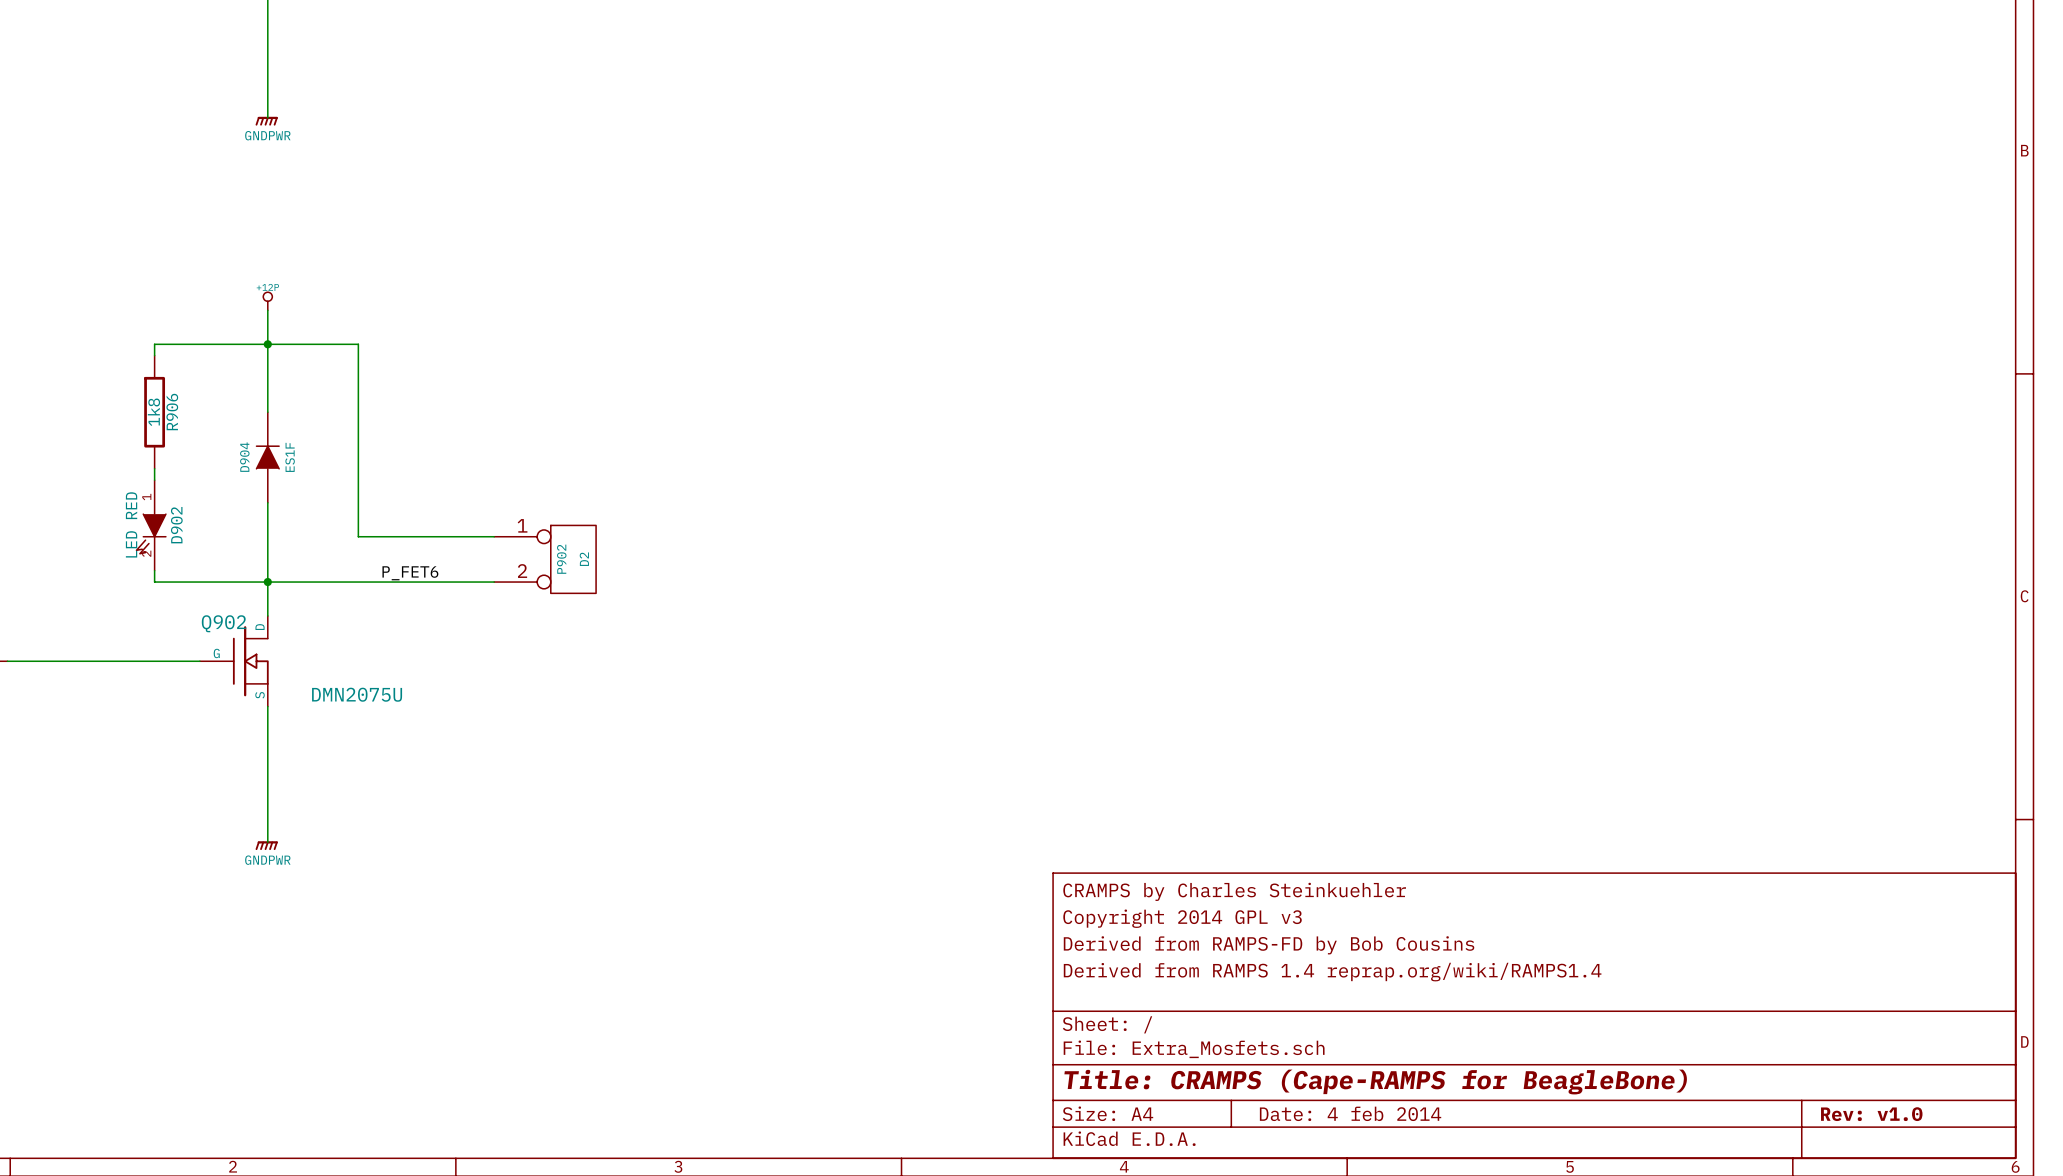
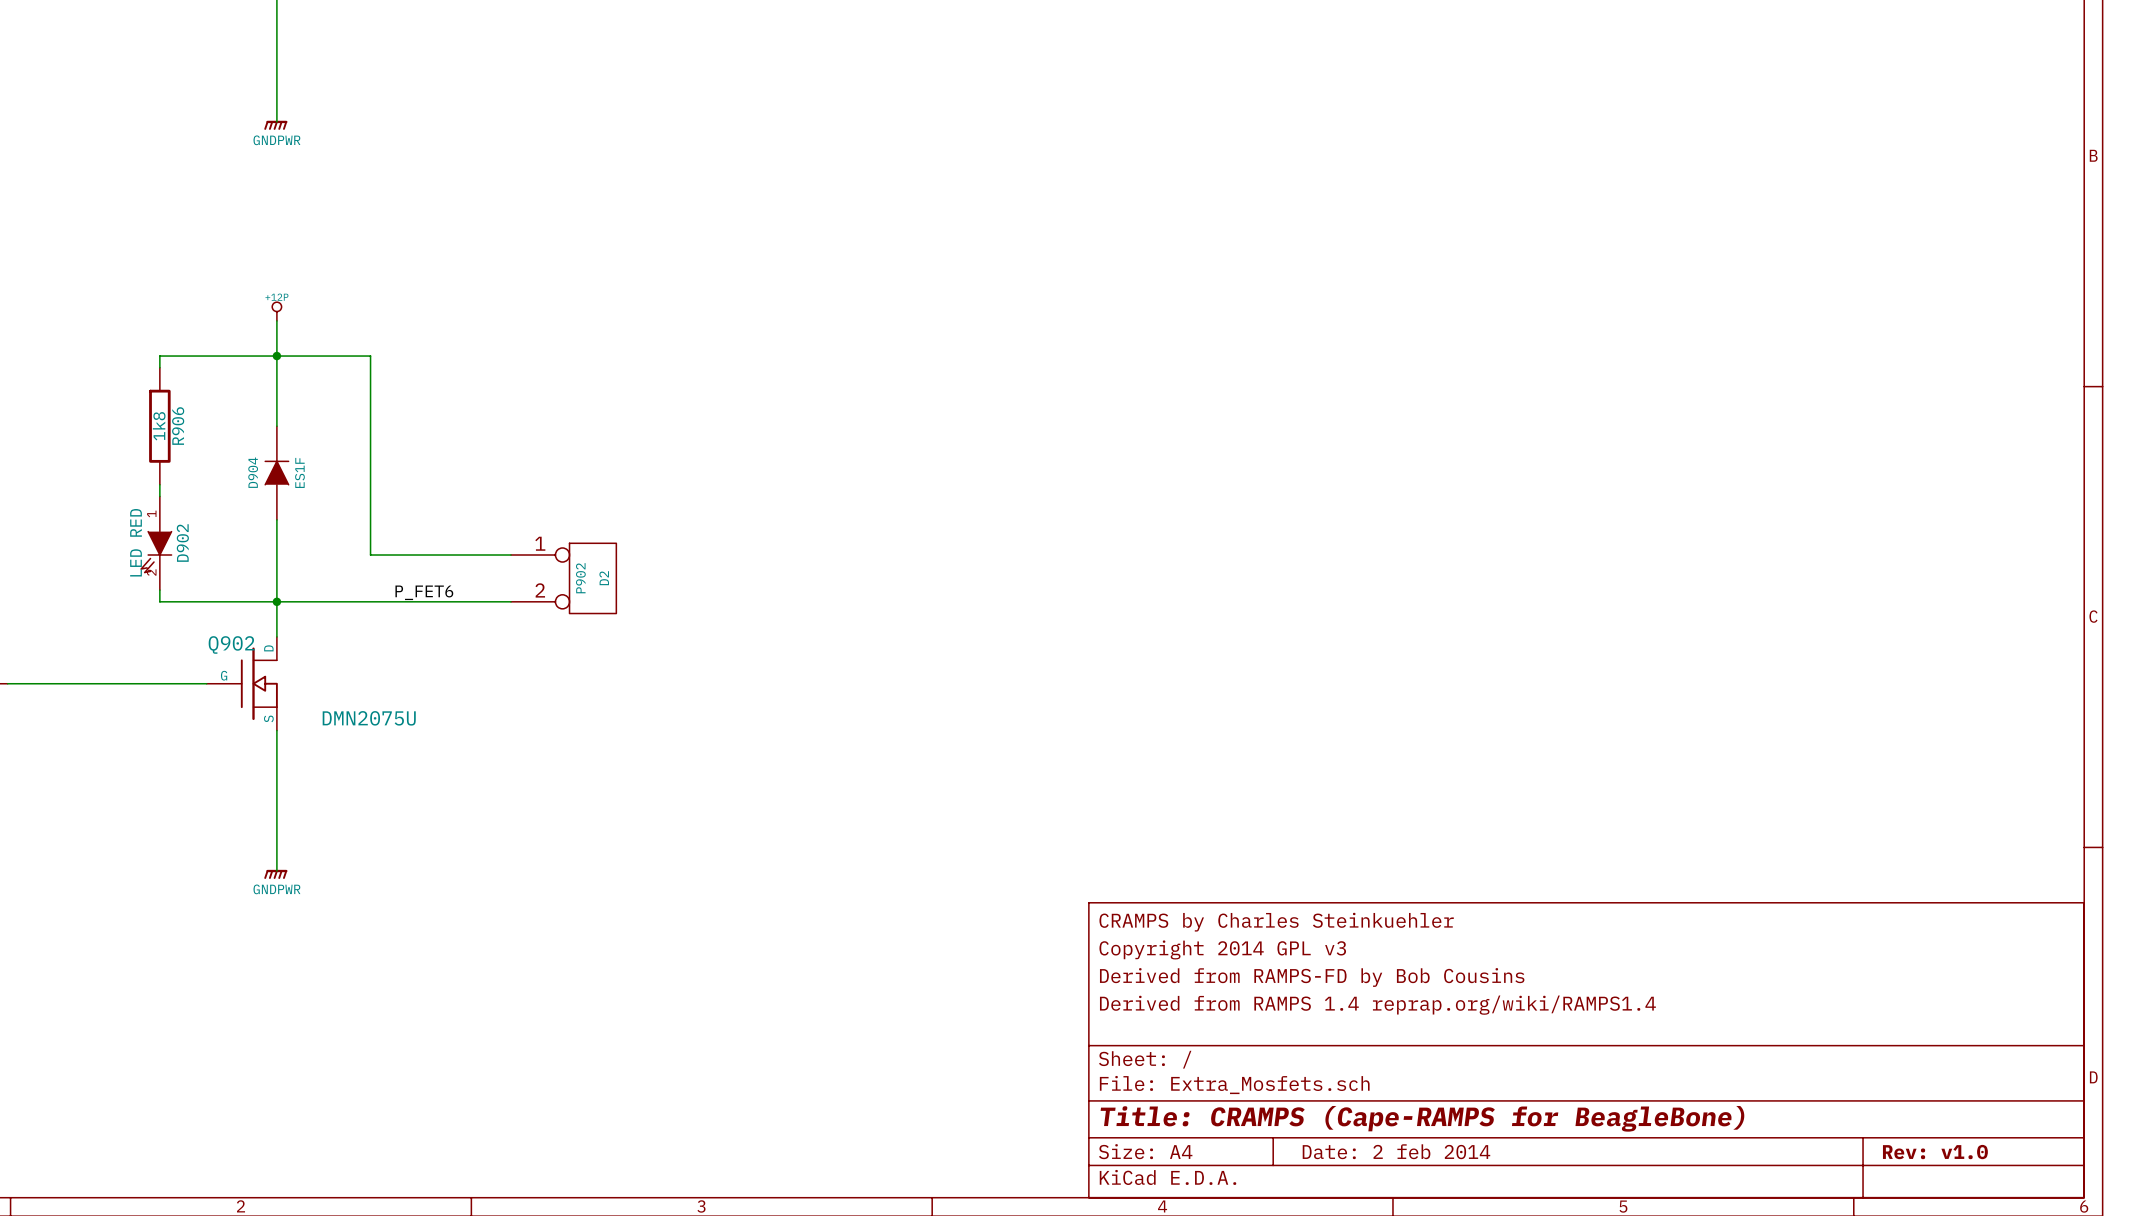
title block: Date: 4 feb 2014 (1350, 1113) -> Date: 2 feb 2014 (1396, 1151)

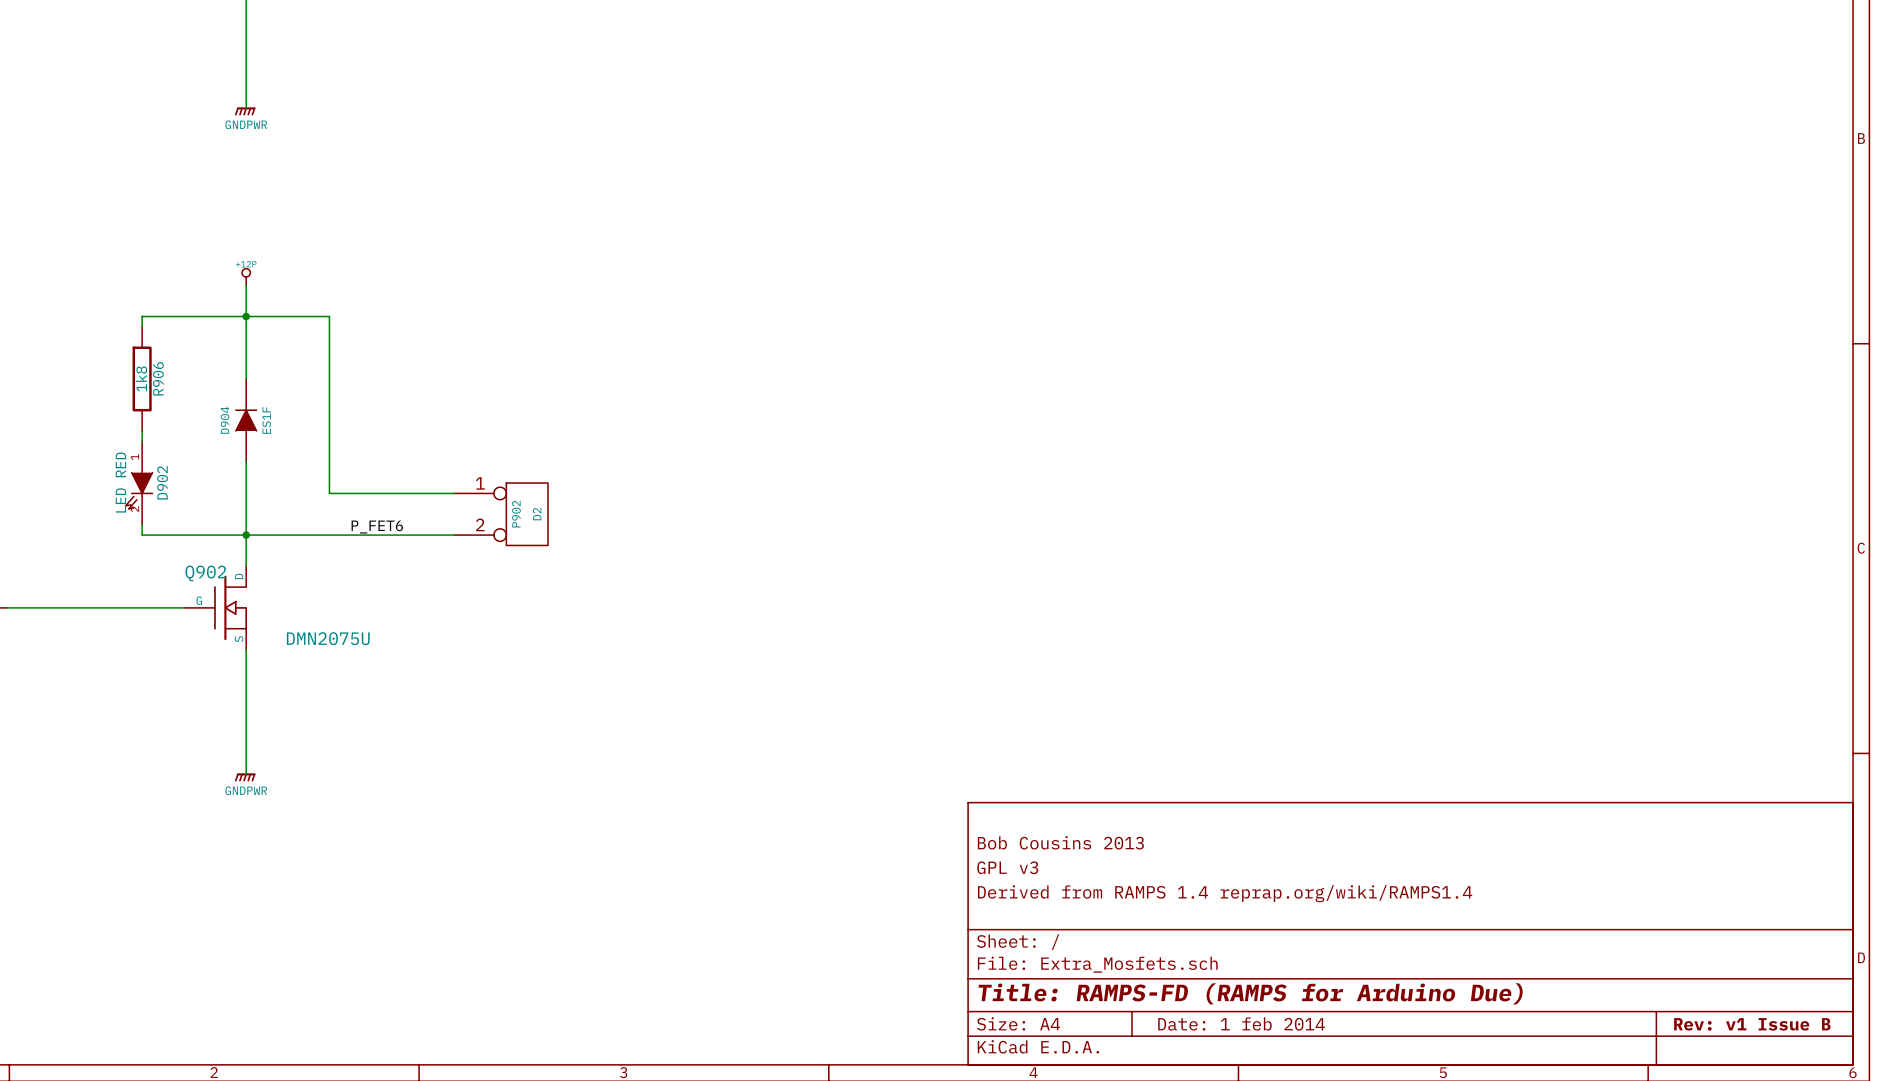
title block: CRAMPS by Charles Steinkuehler (1276, 922) -> none
title block: Copyright 2014 GPL v3 (1222, 949) -> Bob Cousins 2013 (1060, 842)
title block: Derived from RAMPS-FD by Bob Cousins (1312, 977) -> GPL v3 (1007, 867)
title block: Title: CRAMPS (Cape-RAMPS for BeagleBone) (1422, 1118) -> Title: RAMPS-FD (RAMPS for Arduino Due) (1250, 993)
title block: Date: 2 feb 2014 (1396, 1151) -> Date: 1 feb 2014 (1241, 1023)
title block: Rev: v1.0 (1935, 1152) -> Rev: v1 Issue B (1752, 1024)

